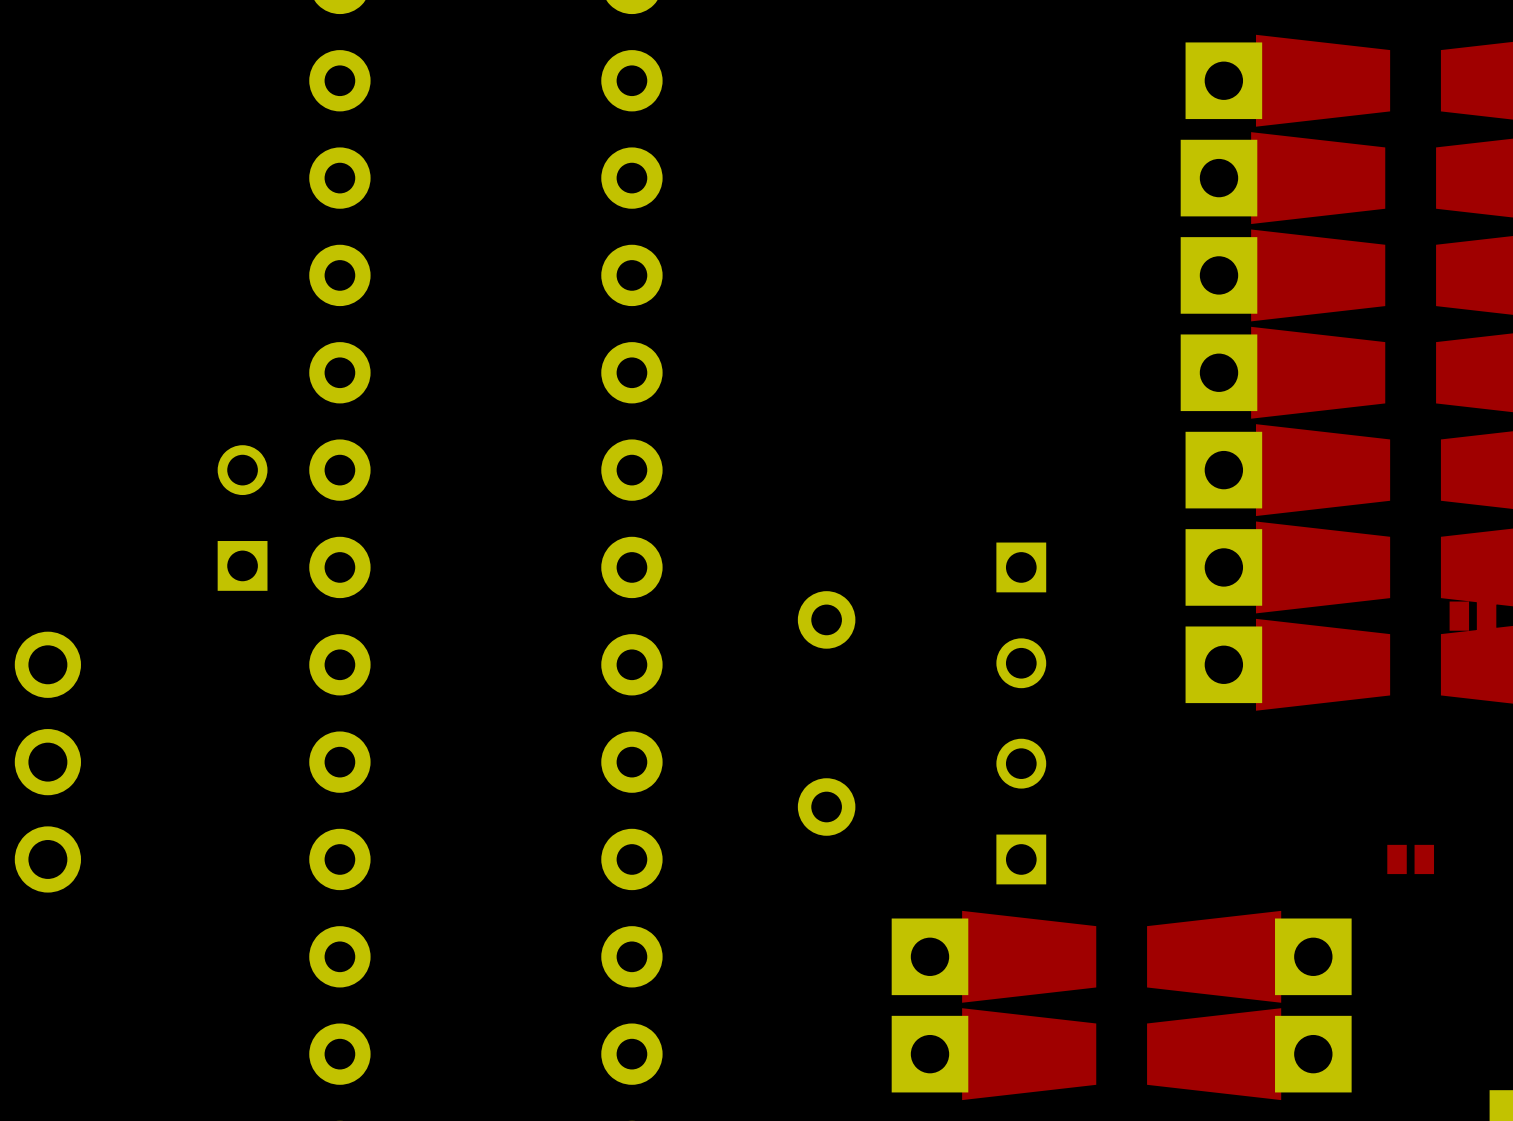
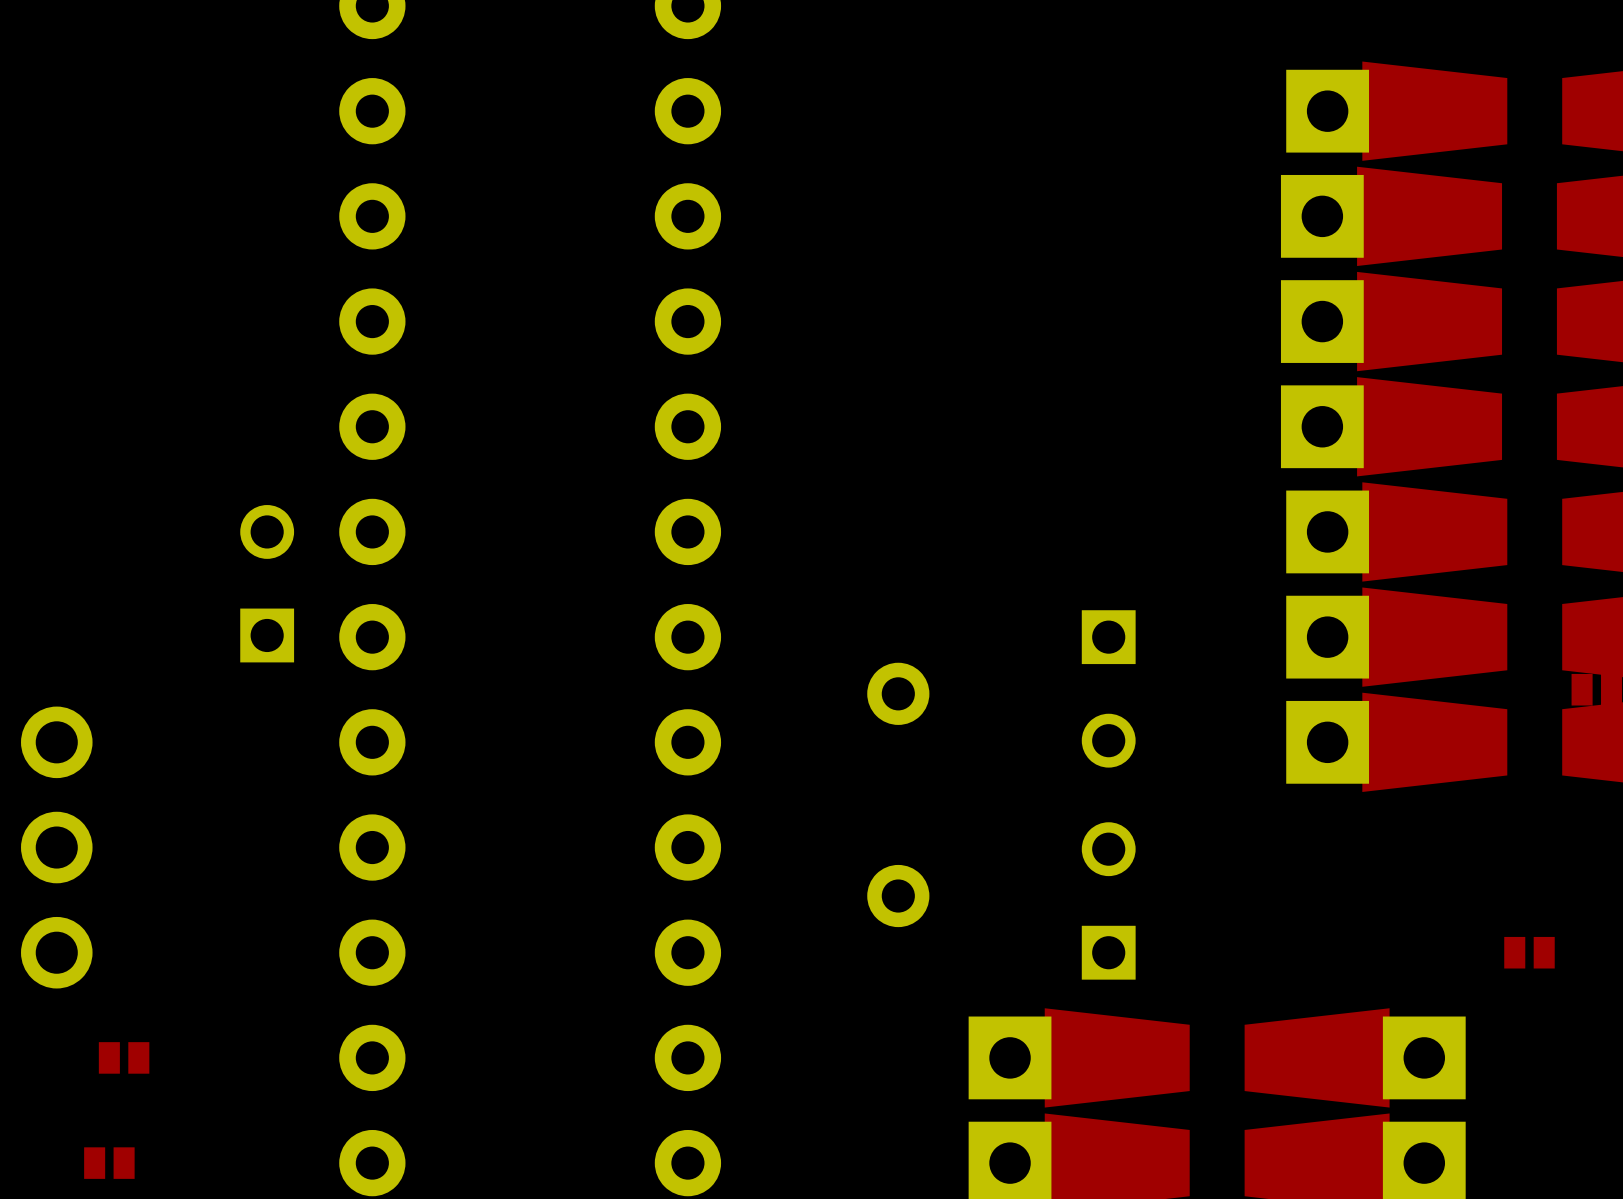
part: none -> (124, 1057)
part: none -> (109, 1163)

